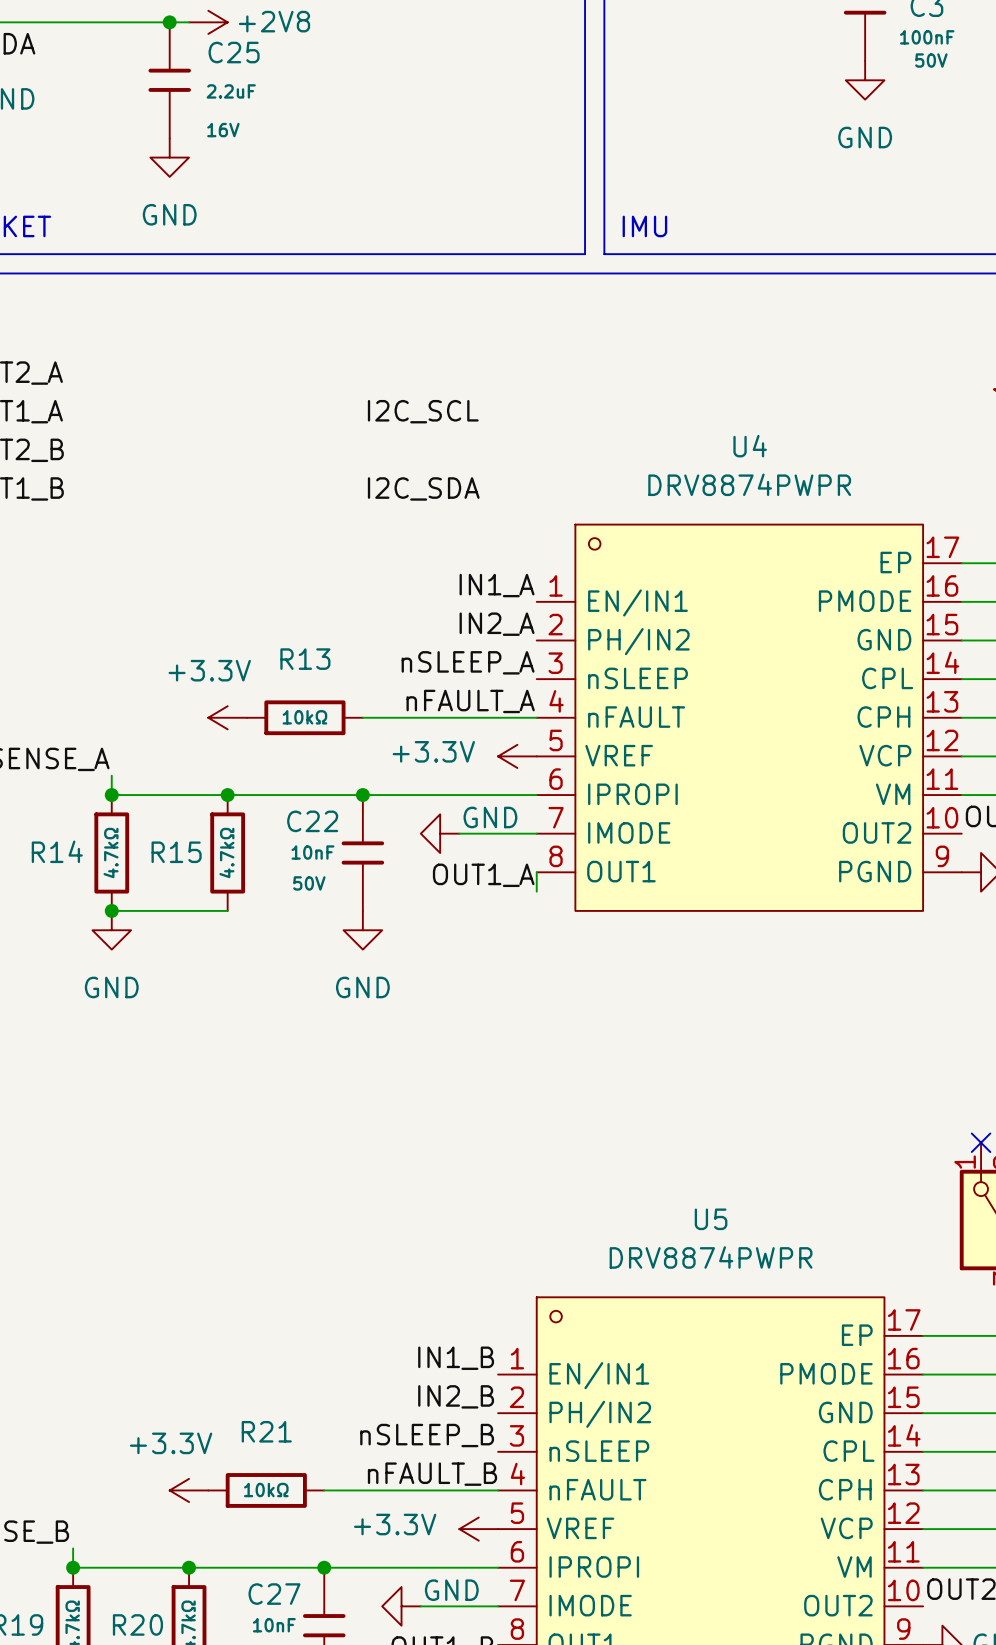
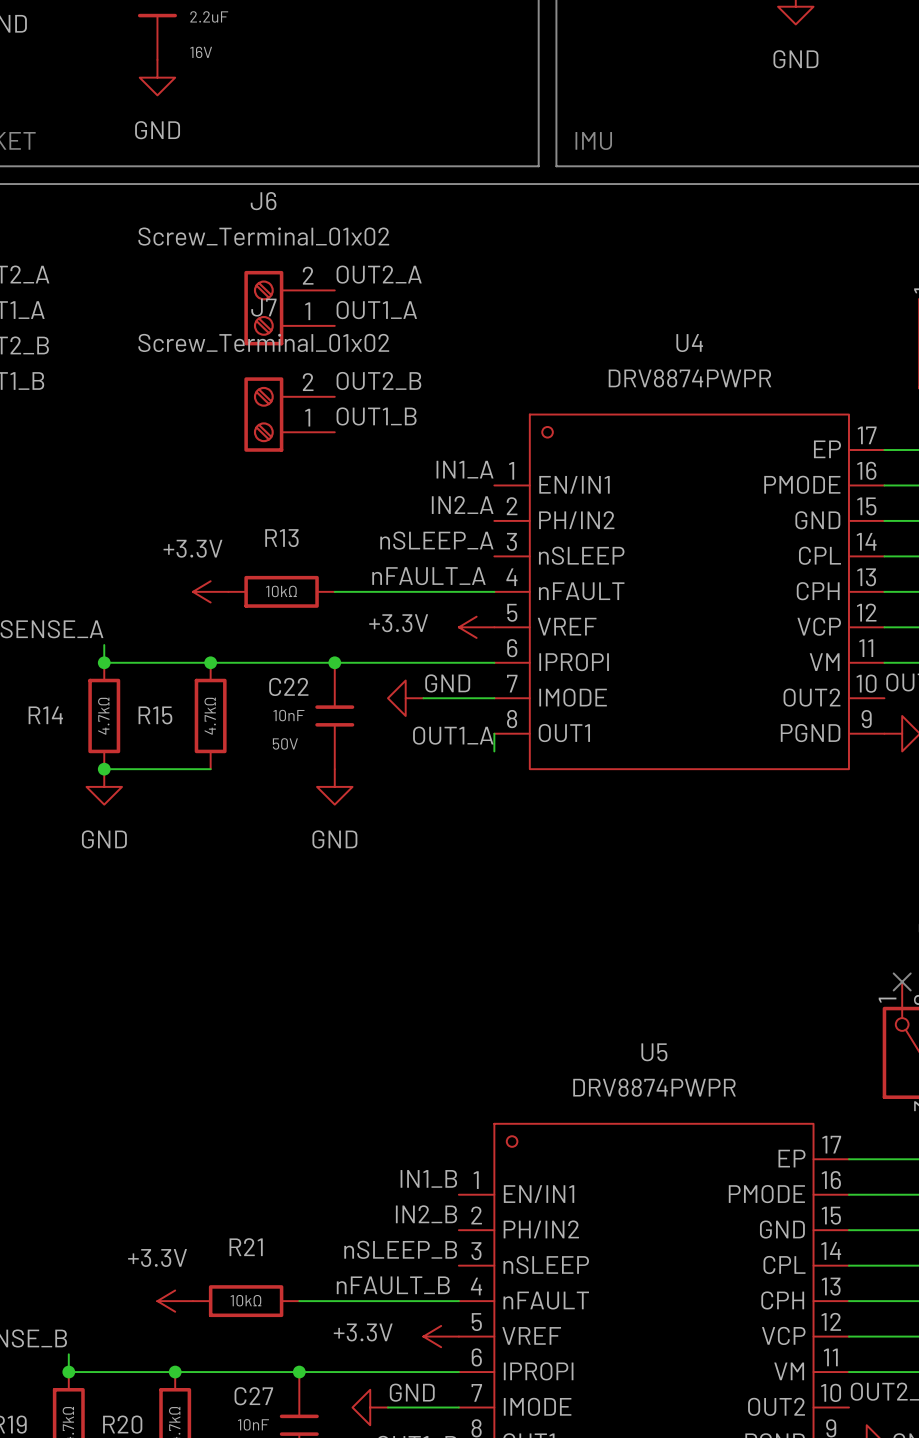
label: none -> OUT2_A (379, 274)
J6: none -> Screw_Terminal_01x02 (289, 308)
label: I2C_SCL (423, 411) -> OUT1_A (376, 310)
label: I2C_SDA (423, 488) -> OUT2_B (378, 380)
J7: none -> Screw_Terminal_01x02 (289, 414)
label: none -> OUT1_B (376, 416)

